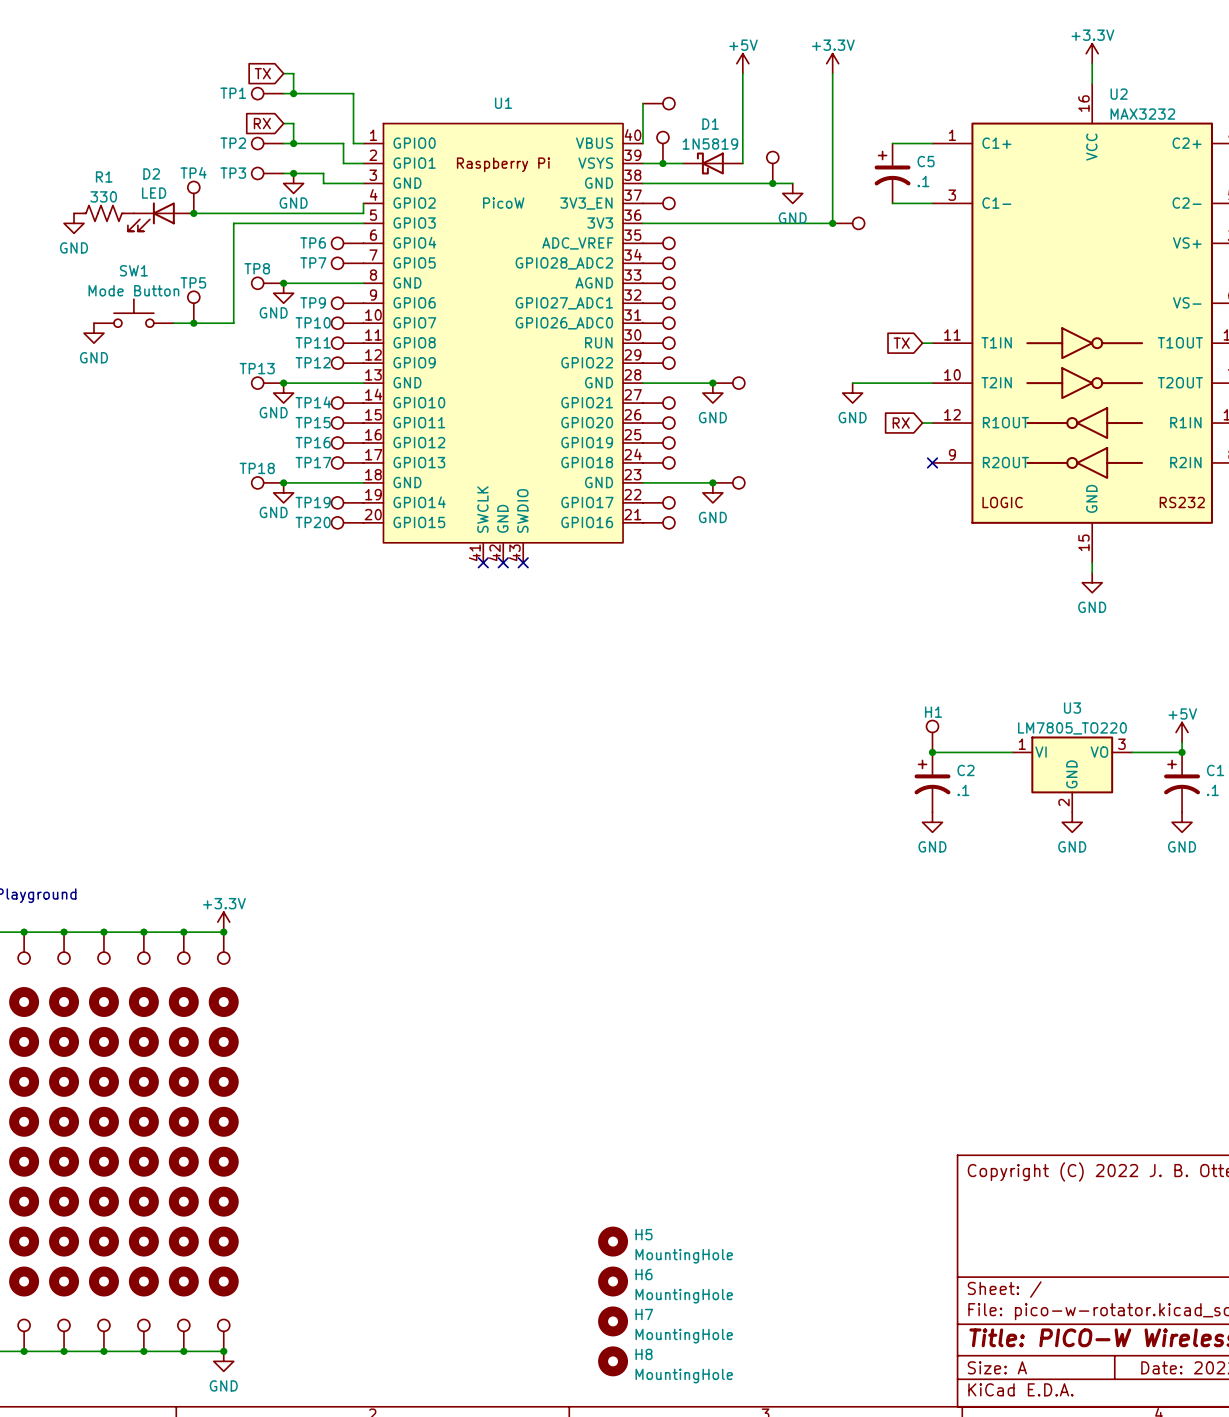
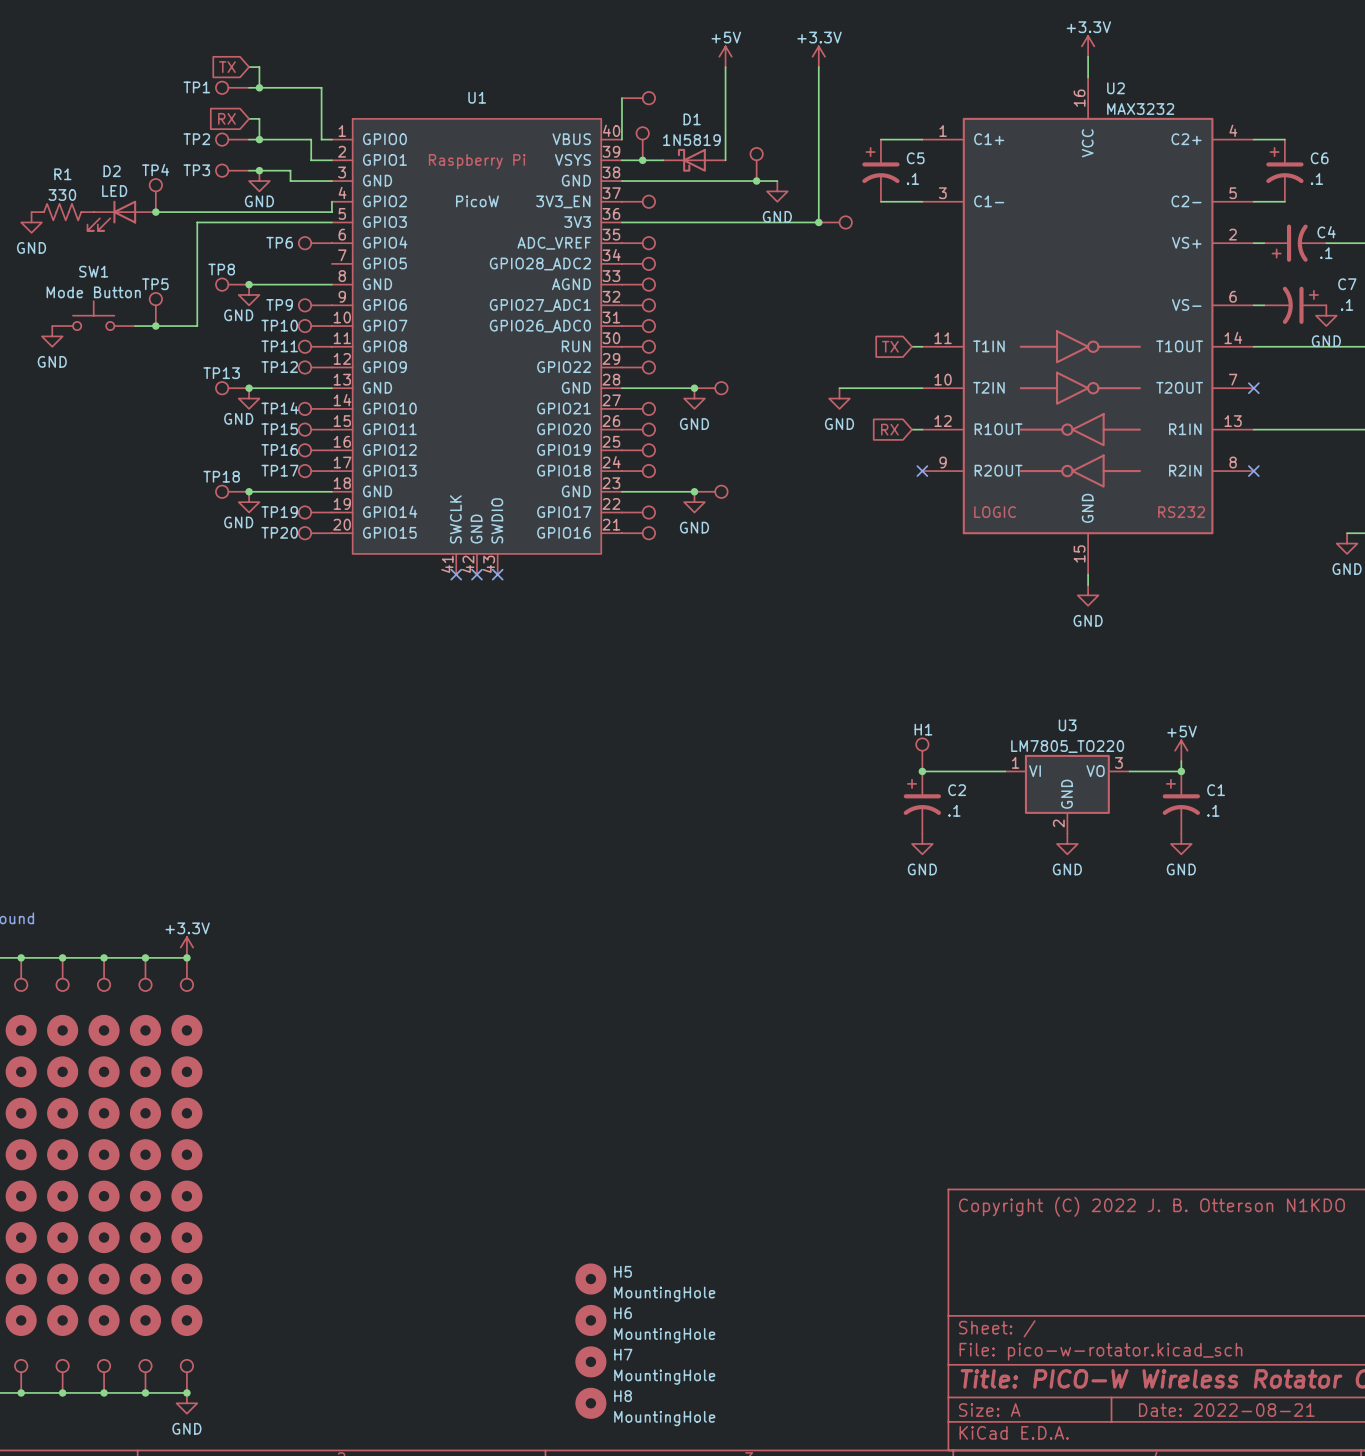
TP7: (347, 263) -> none

